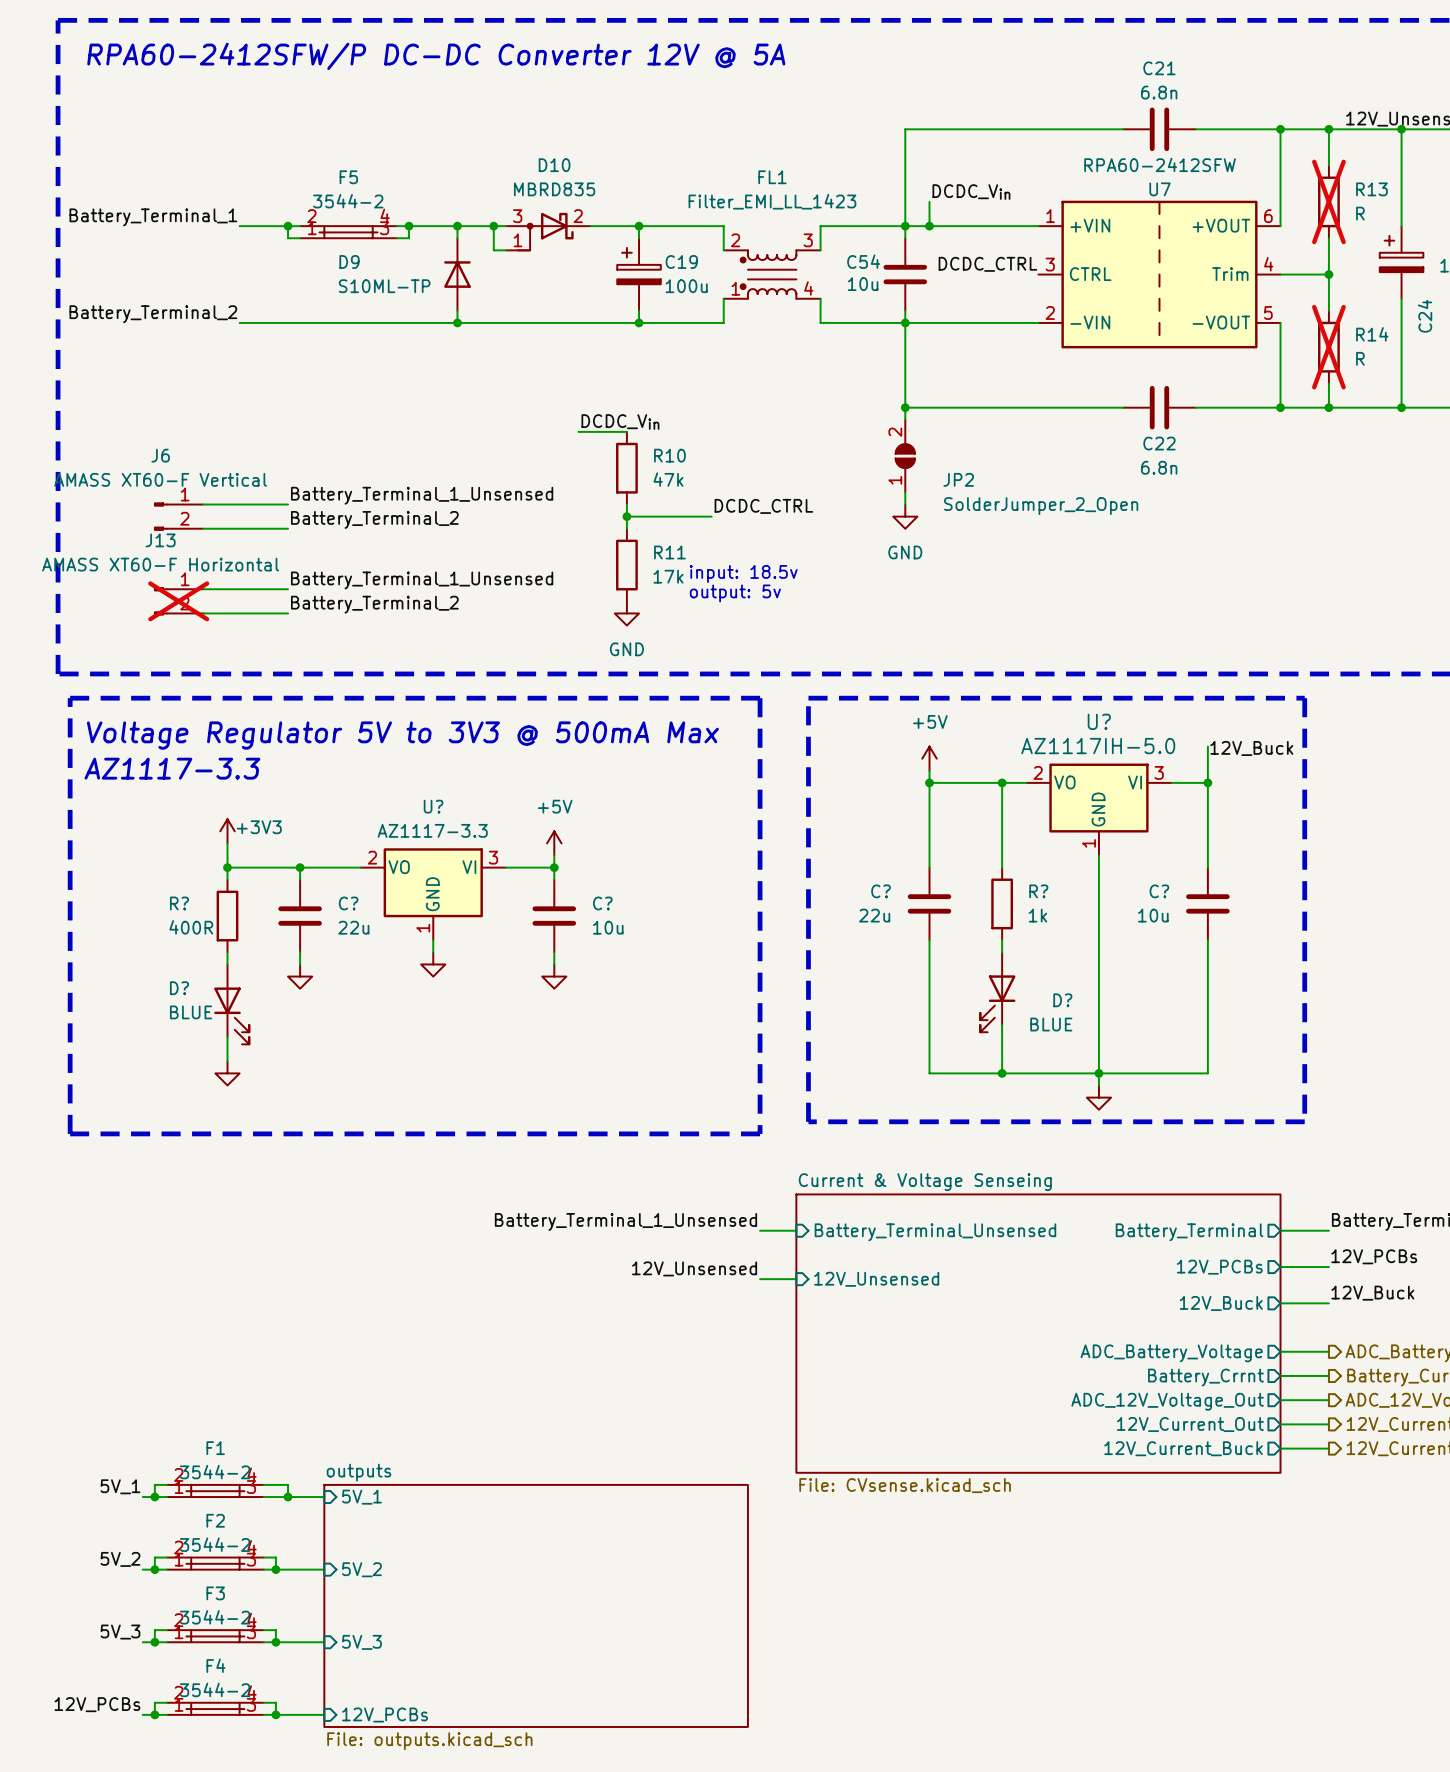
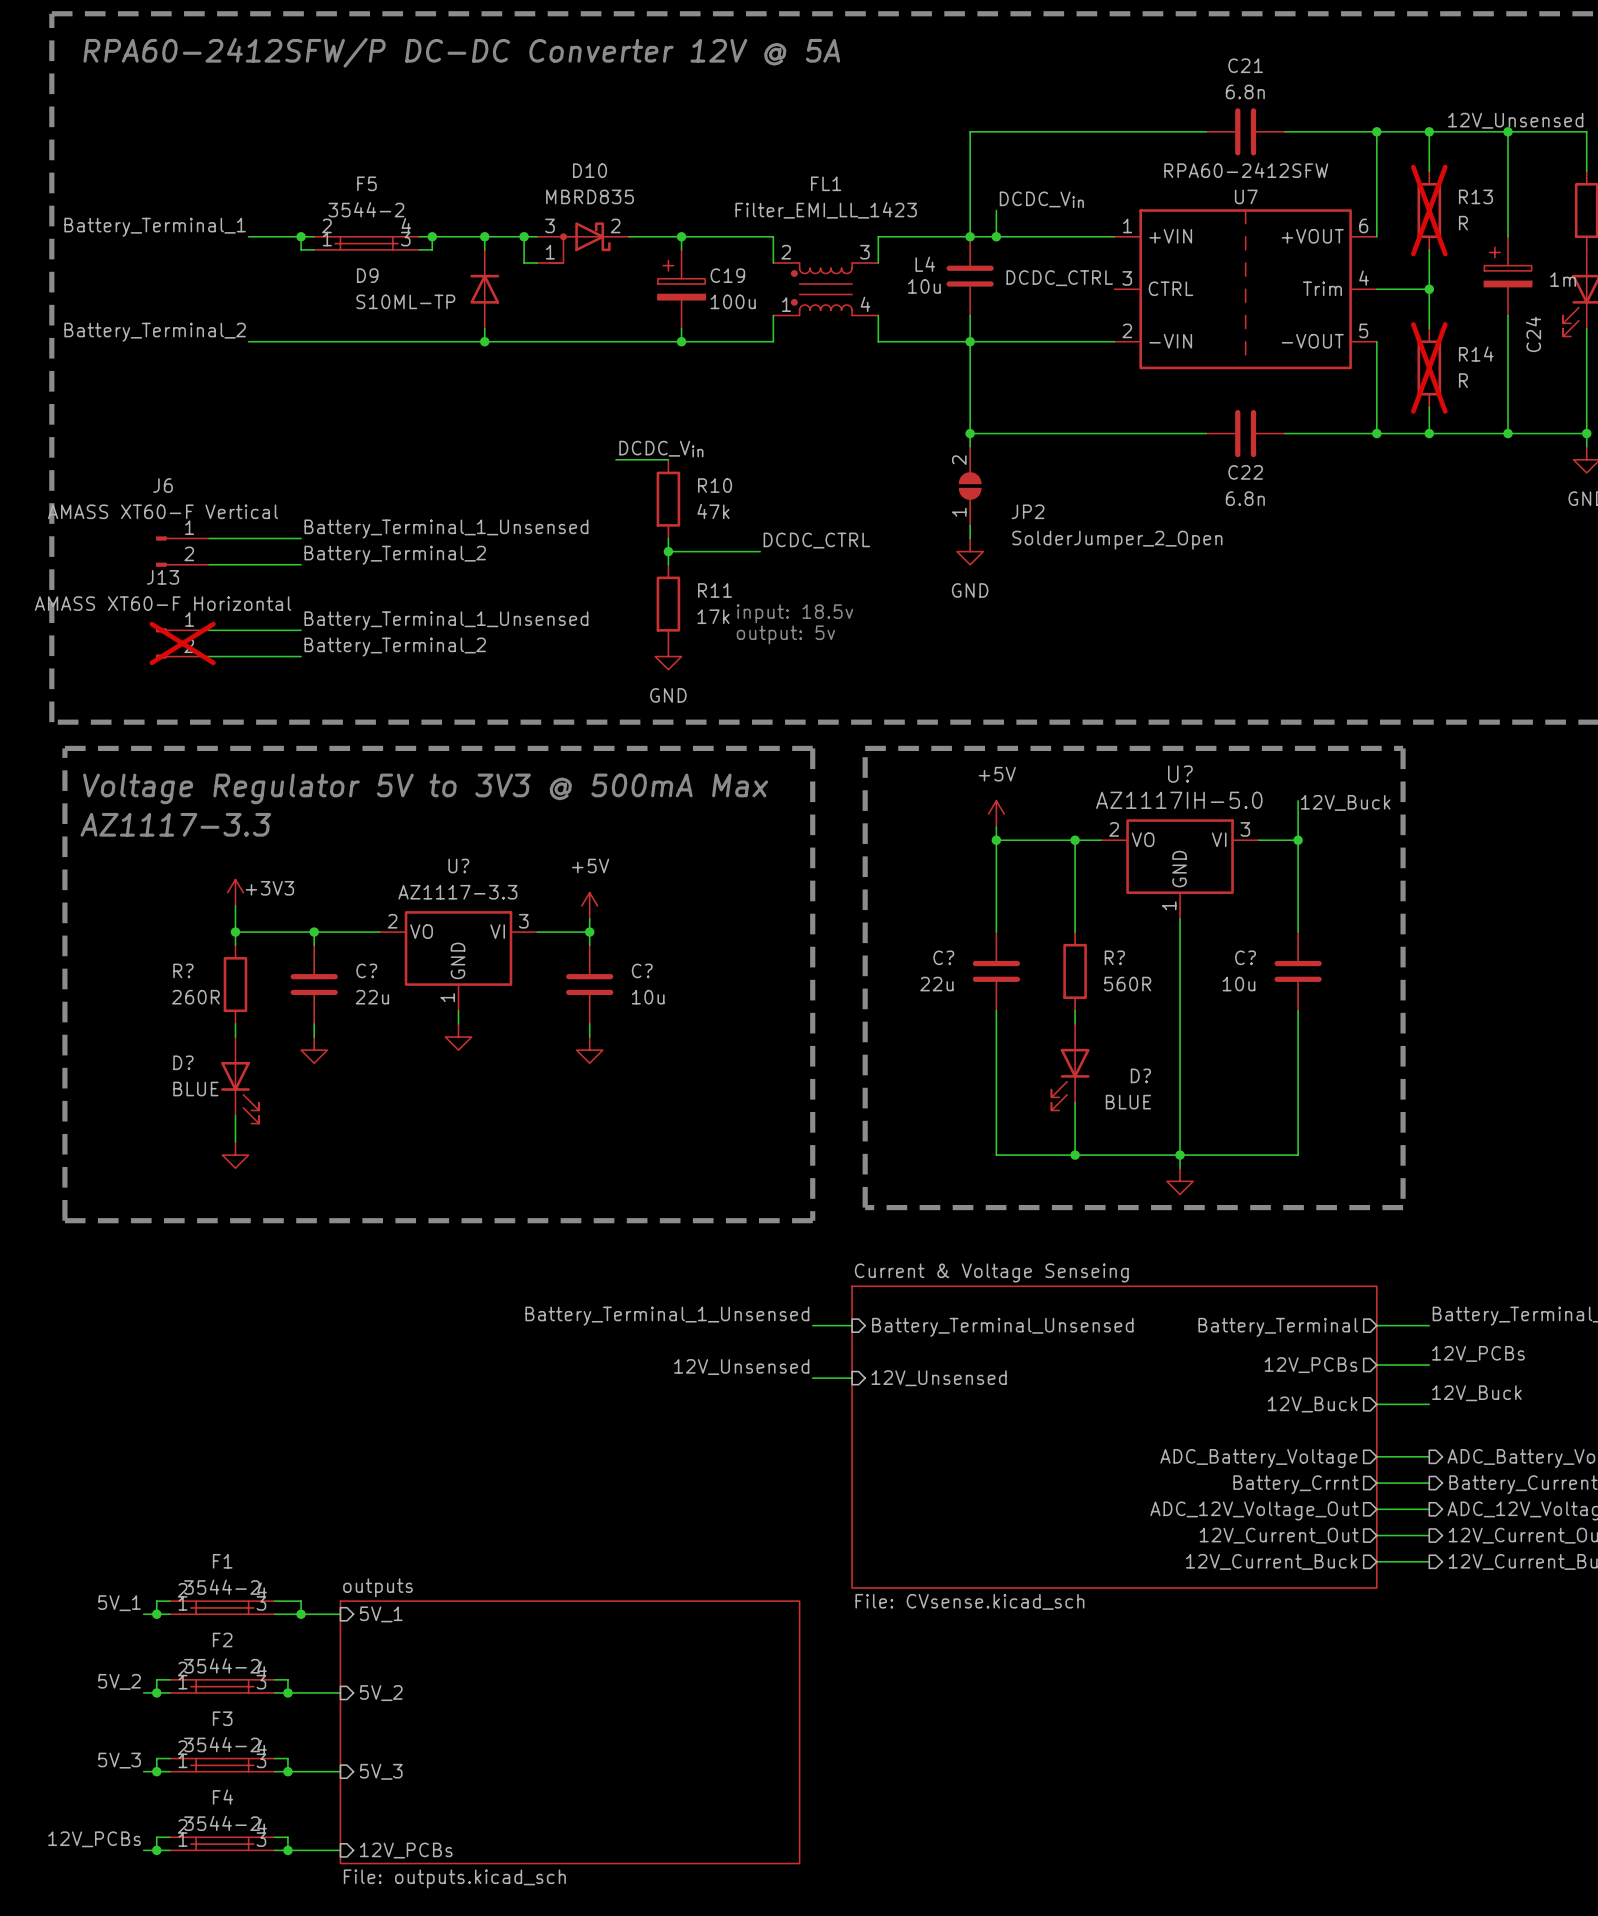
L4: none -> 10u (970, 276)
C54: 10u (905, 274) -> none
R? value: 1k (1037, 915) -> 560R (1127, 984)
R? value: 400R (191, 927) -> 260R (195, 997)

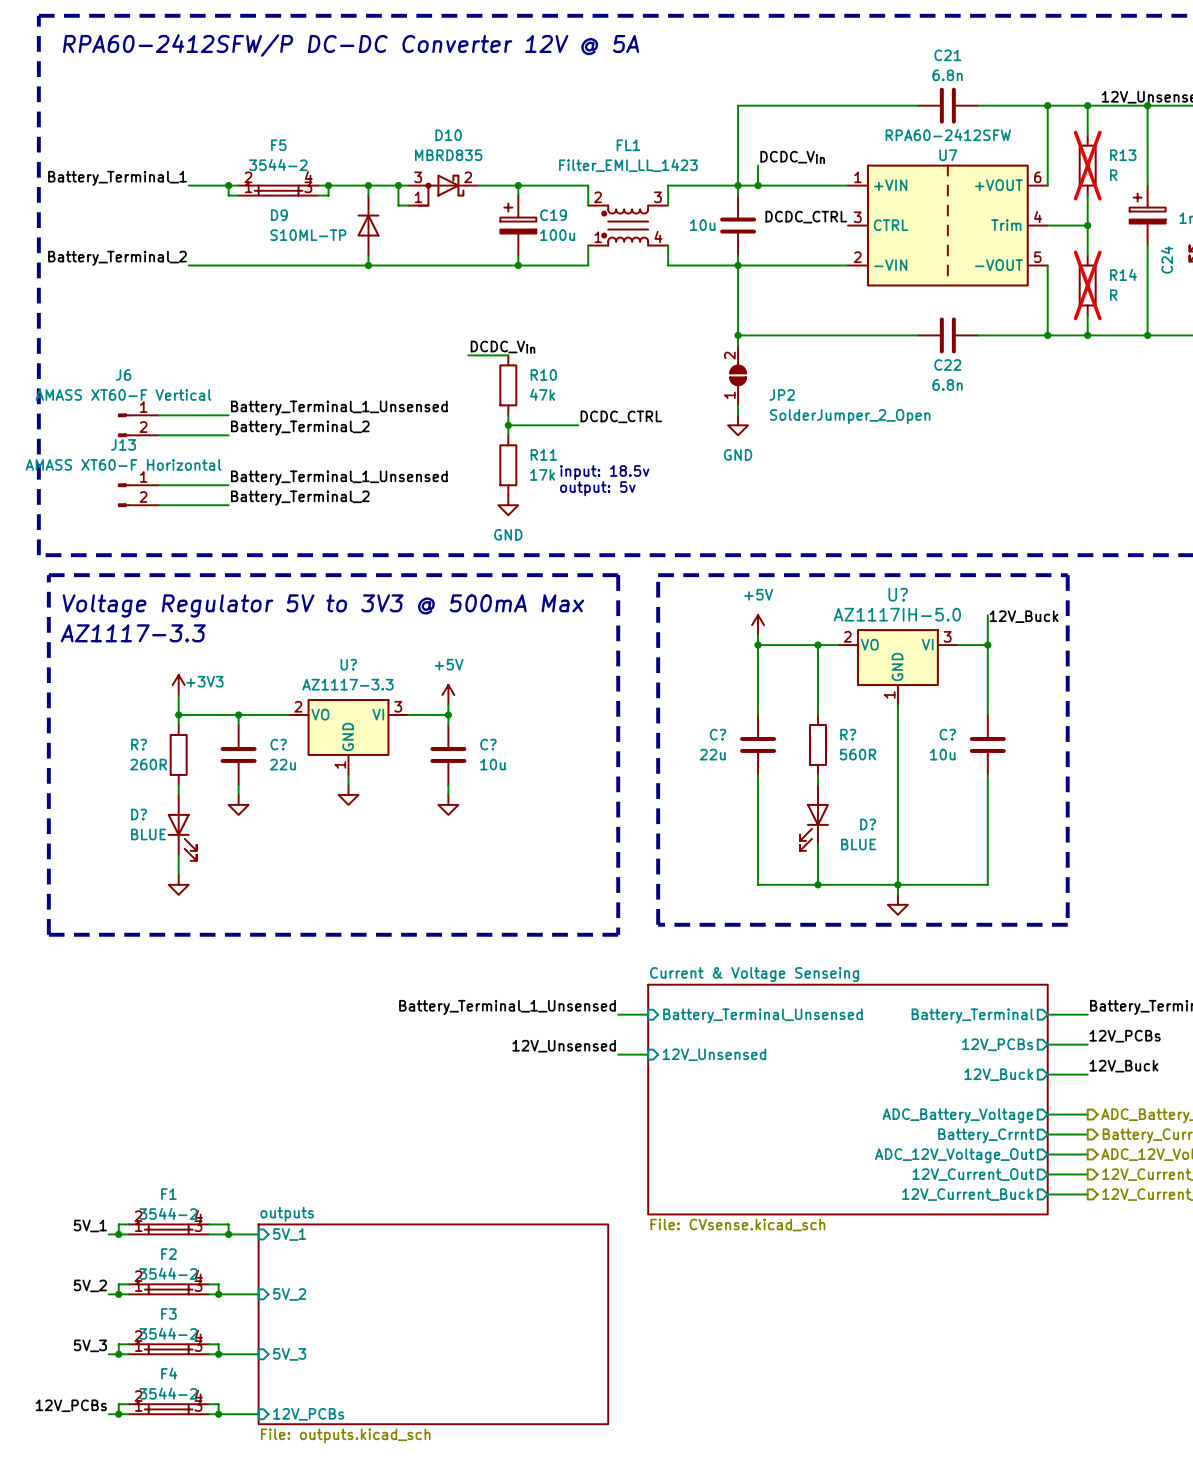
L4: 10u (970, 276) -> none
part: none -> 10u (738, 225)
J13 do-not-place cross: (182, 643) -> none

